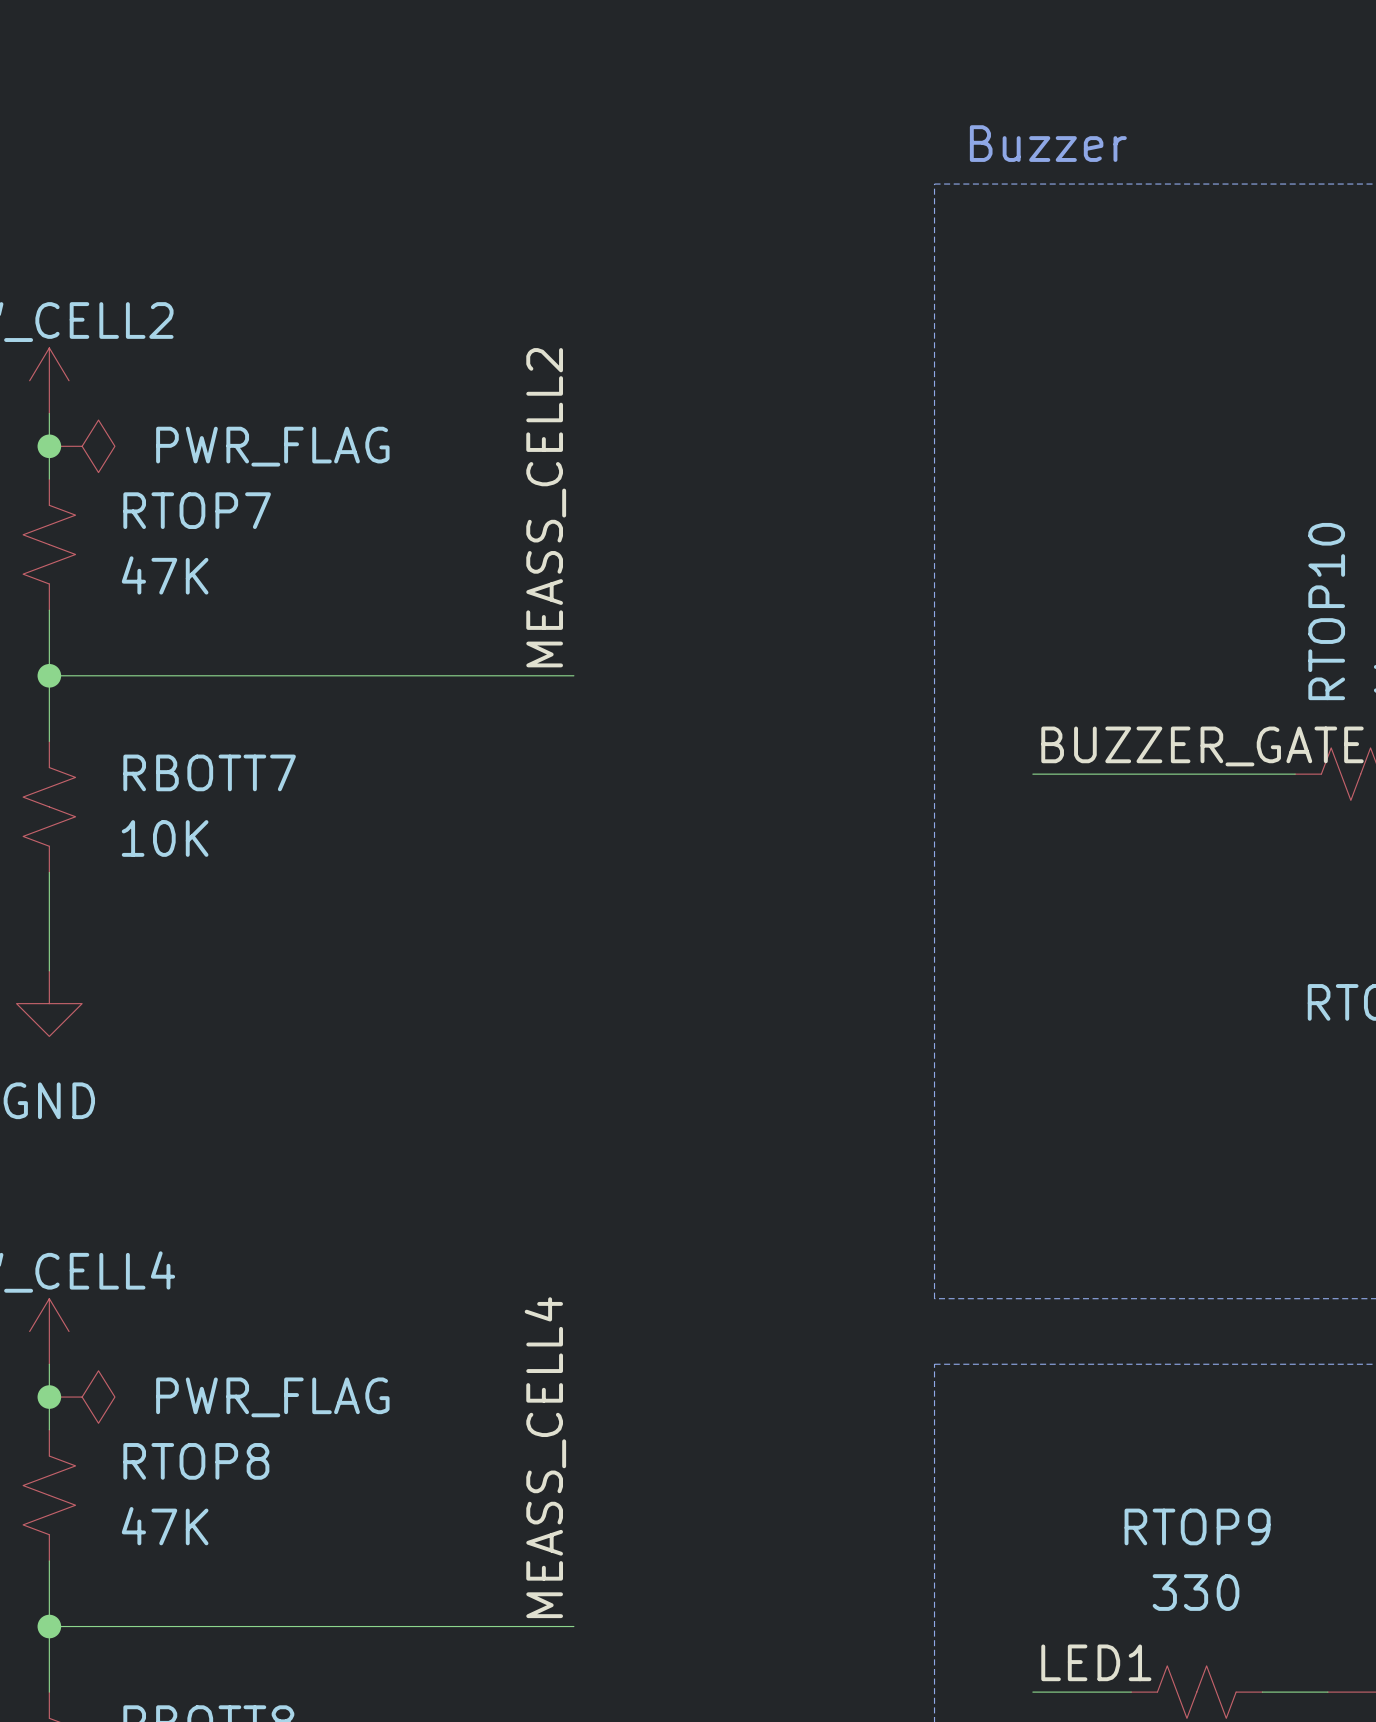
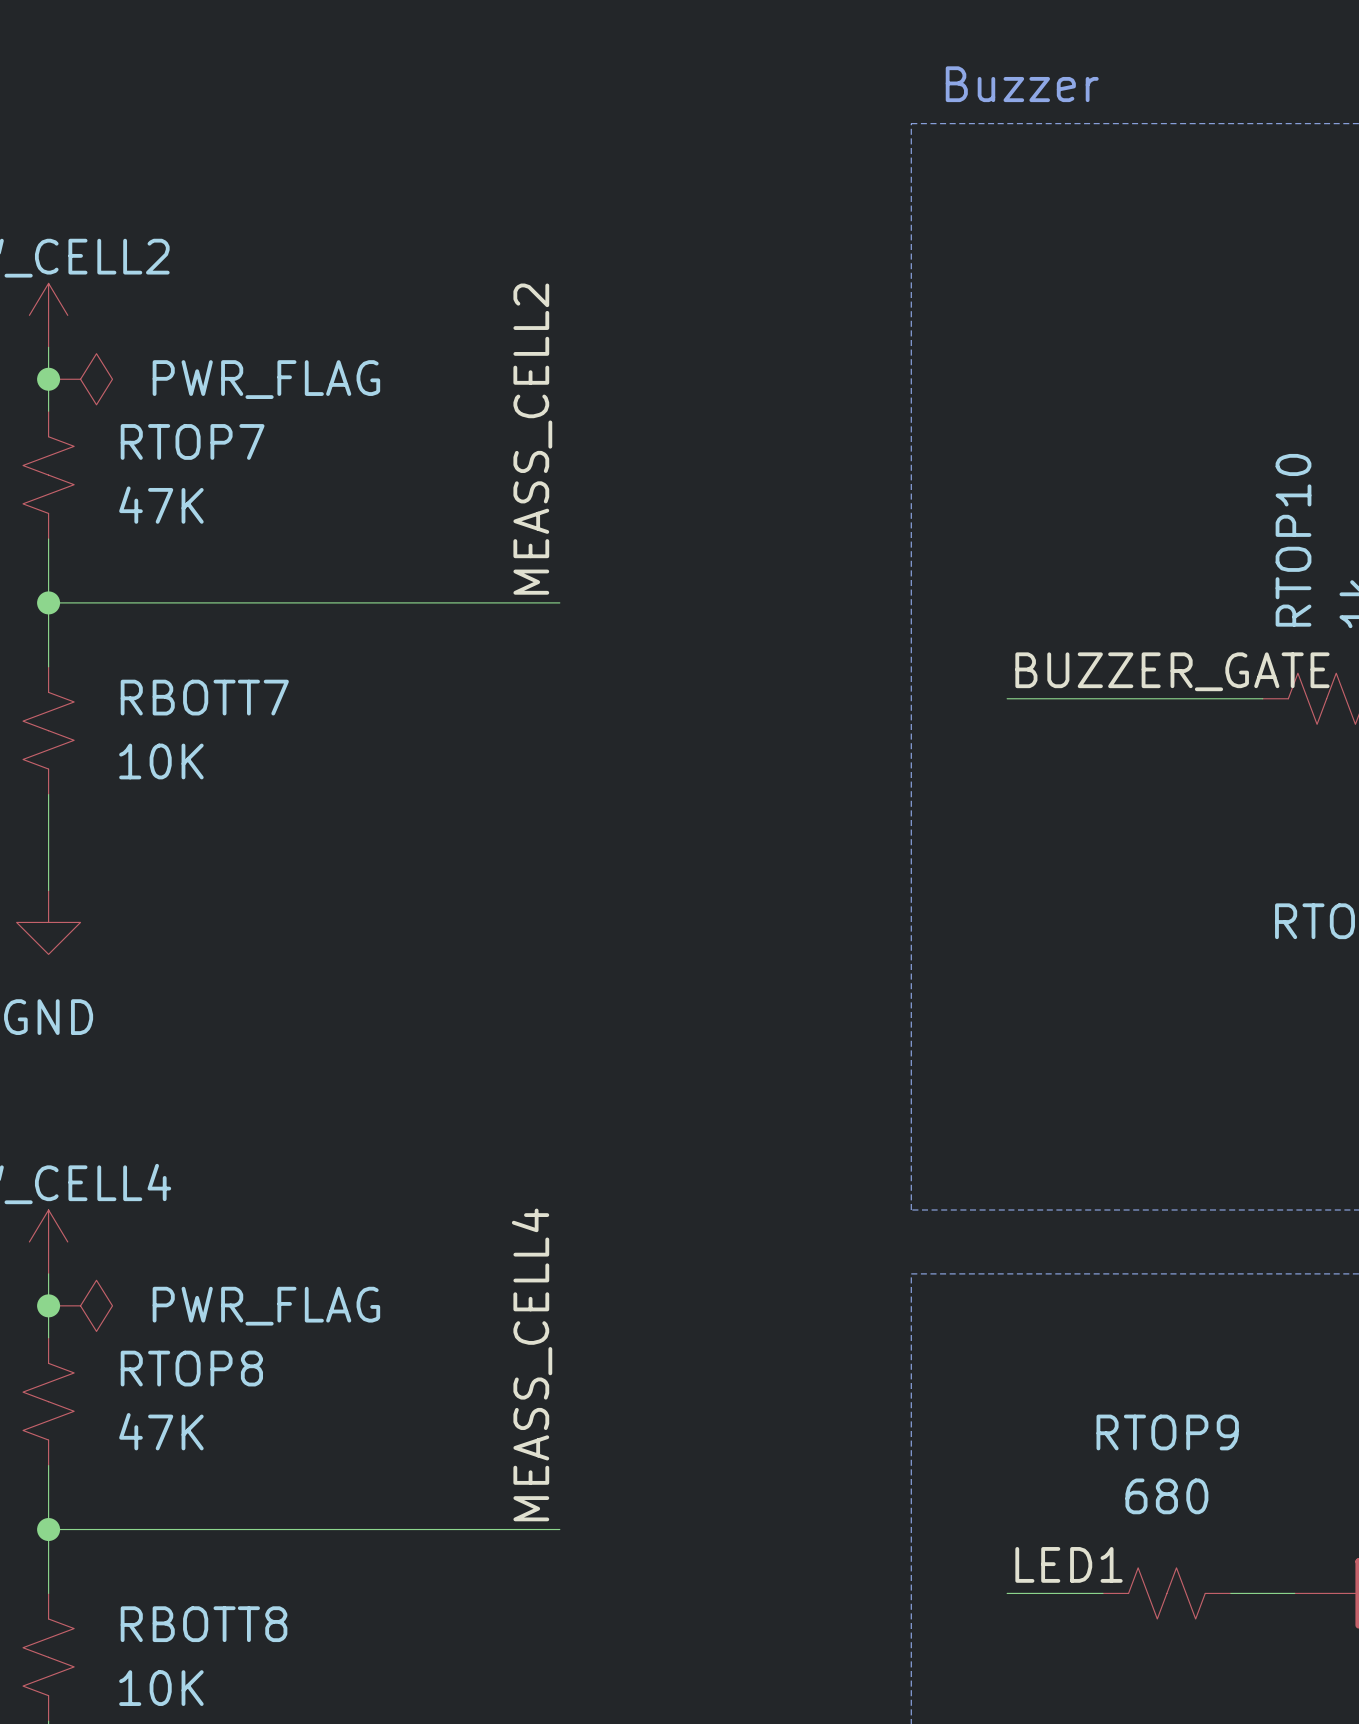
RTOP9 value: 330 (1196, 1592) -> 680 (1166, 1496)

